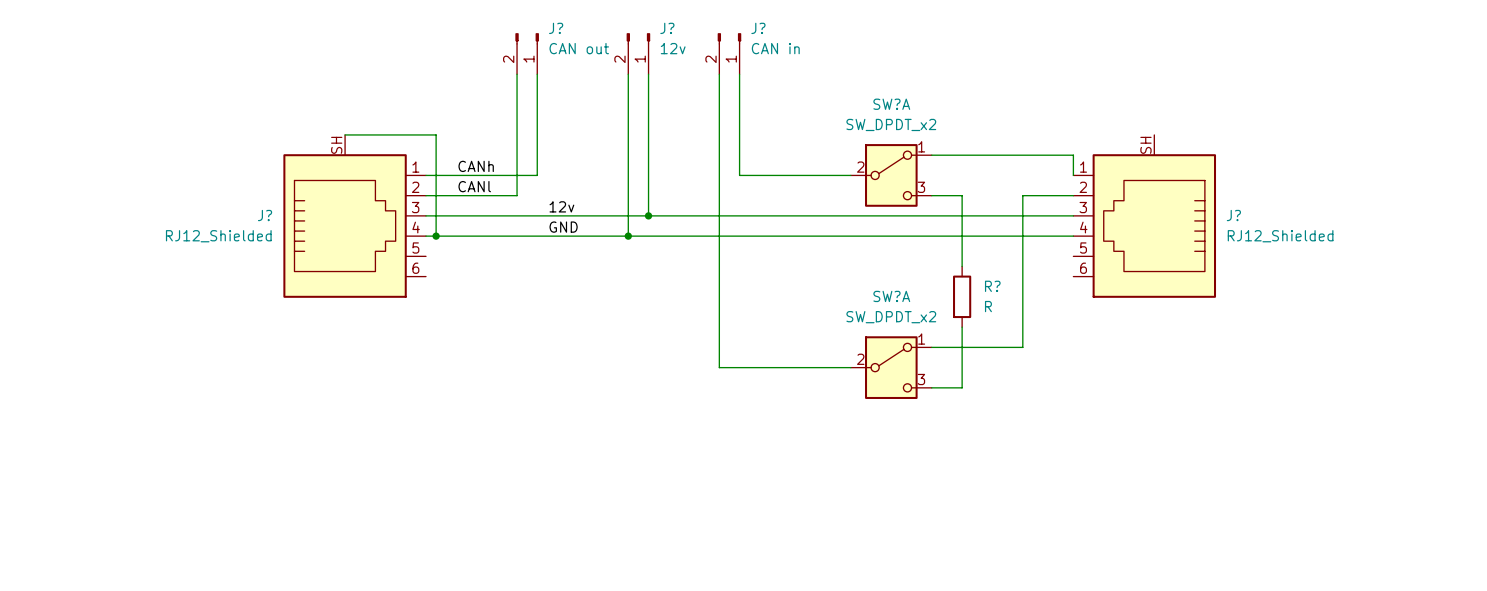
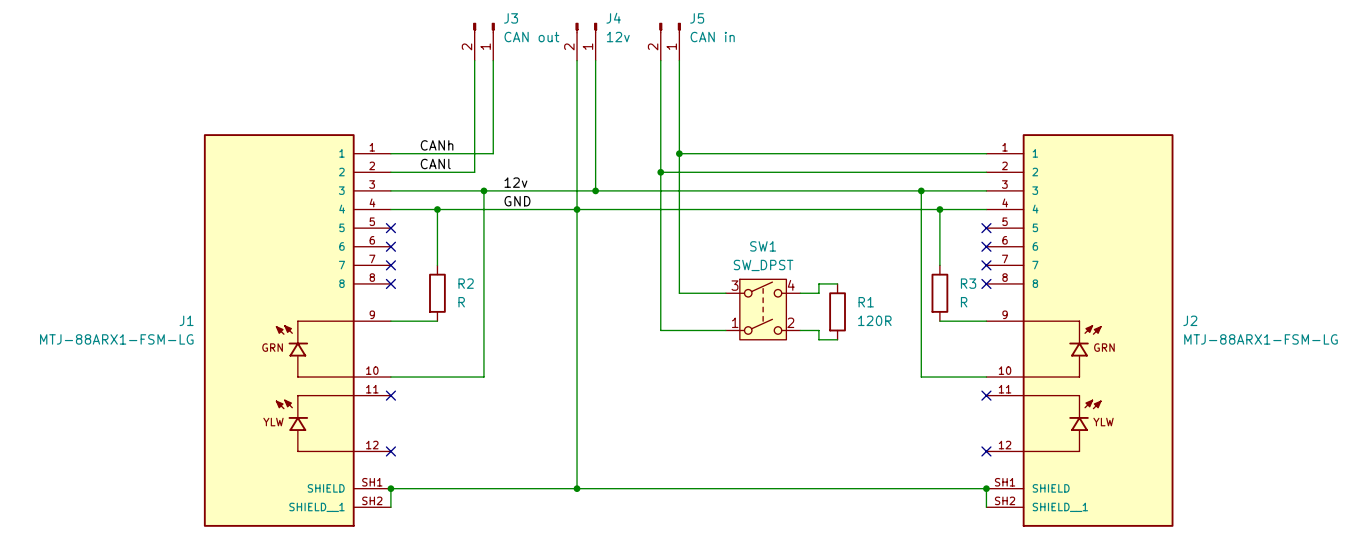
J? name: J? (556, 28) -> J3 (511, 18)
J? name: J? (667, 28) -> J4 (613, 18)
J? name: J? (758, 28) -> J5 (697, 18)
wire: (345, 134) (436, 134) (436, 236) -> none
wire: (931, 155) (1073, 155) (1073, 175) -> (781, 153) (986, 153)
wire: none -> (679, 153) (679, 293) (725, 293)
junction: none -> (679, 153)
SW?A: SW_DPDT_x2 (891, 175) -> none
wire: none -> (660, 172) (856, 172)
junction: none -> (660, 172)
wire: (962, 195) (962, 266) -> none
wire: (1022, 195) (1022, 236) -> (939, 172) (884, 172)
wire: none -> (483, 190) (483, 377) (390, 377)
junction: none -> (483, 190)
wire: none -> (921, 190) (921, 377) (986, 377)
junction: none -> (921, 190)
J?: RJ12_Shielded (354, 216) -> none
J?: RJ12_Shielded (1144, 216) -> none
junction position: (436, 236) -> (437, 209)
wire: none -> (437, 209) (437, 265)
wire: none -> (577, 209) (577, 488)
junction: none -> (939, 209)
no-connect mark: none -> (390, 228)
no-connect mark: none -> (986, 228)
no-connect mark: none -> (390, 246)
no-connect mark: none -> (986, 246)
no-connect mark: none -> (390, 265)
R?: R (962, 296) -> none
wire: (1022, 296) (1022, 347) (931, 347) -> none
no-connect mark: none -> (986, 265)
no-connect mark: none -> (390, 283)
wire: none -> (837, 283) (818, 283) (818, 293) (800, 293)
no-connect mark: none -> (986, 283)
R2: none -> R (437, 293)
wire: (962, 327) (962, 387) (931, 387) -> none
R3: none -> R (939, 293)
SW1: none -> SW_DPST (763, 309)
R1: none -> 120R (837, 311)
wire: none -> (390, 321) (437, 321)
wire: none -> (939, 321) (986, 321)
J1: none -> MTJ-88ARX1-FSM-LG (297, 330)
SW?A: SW_DPDT_x2 (891, 367) -> none
J2: none -> MTJ-88ARX1-FSM-LG (1079, 330)
no-connect mark: none -> (390, 395)
no-connect mark: none -> (986, 395)
no-connect mark: none -> (390, 451)
no-connect mark: none -> (986, 451)
junction: none -> (390, 488)
junction: none -> (577, 488)
junction: none -> (986, 488)
wire: none -> (390, 507) (390, 488) (986, 488) (986, 507)

